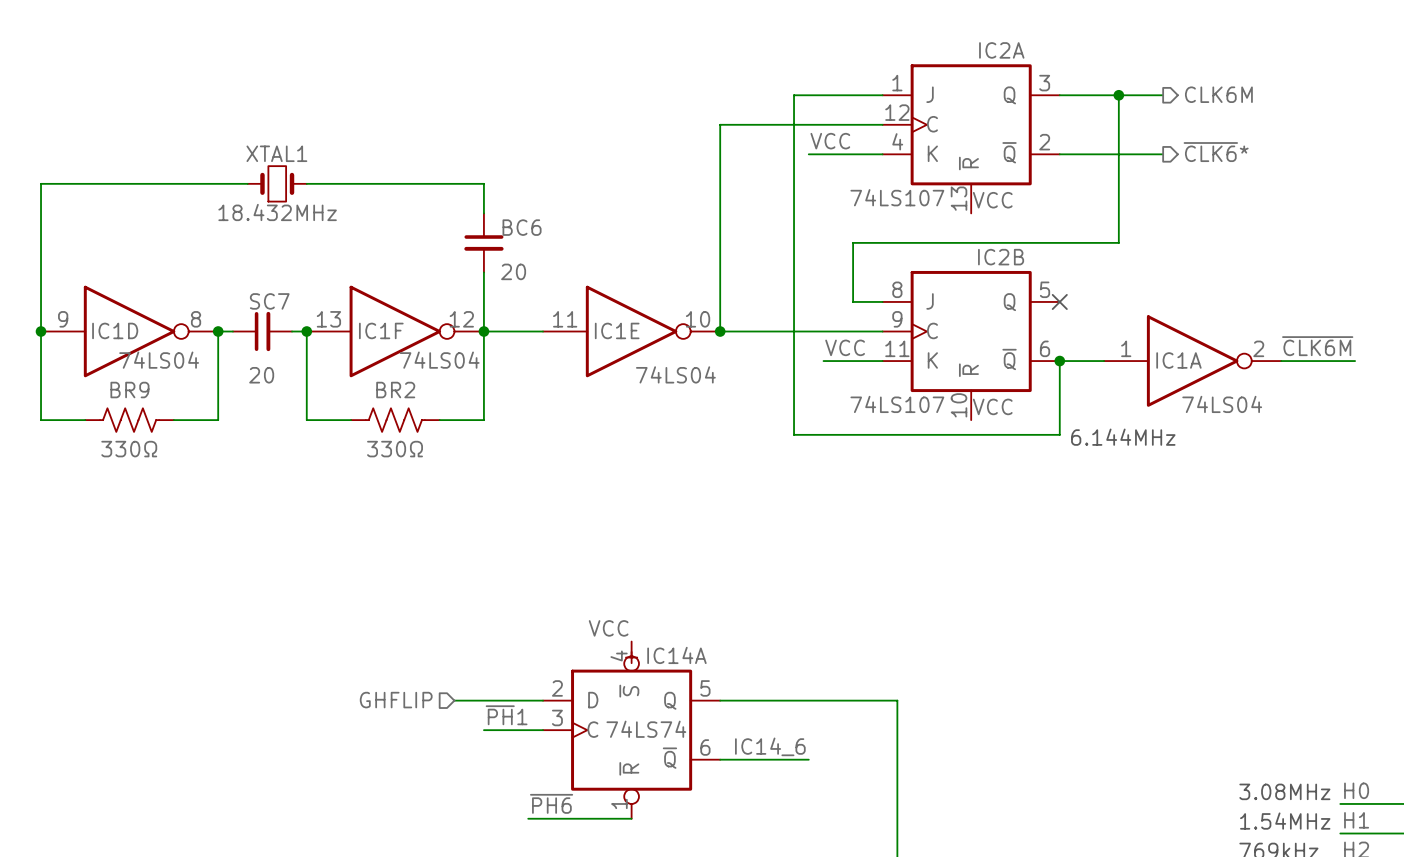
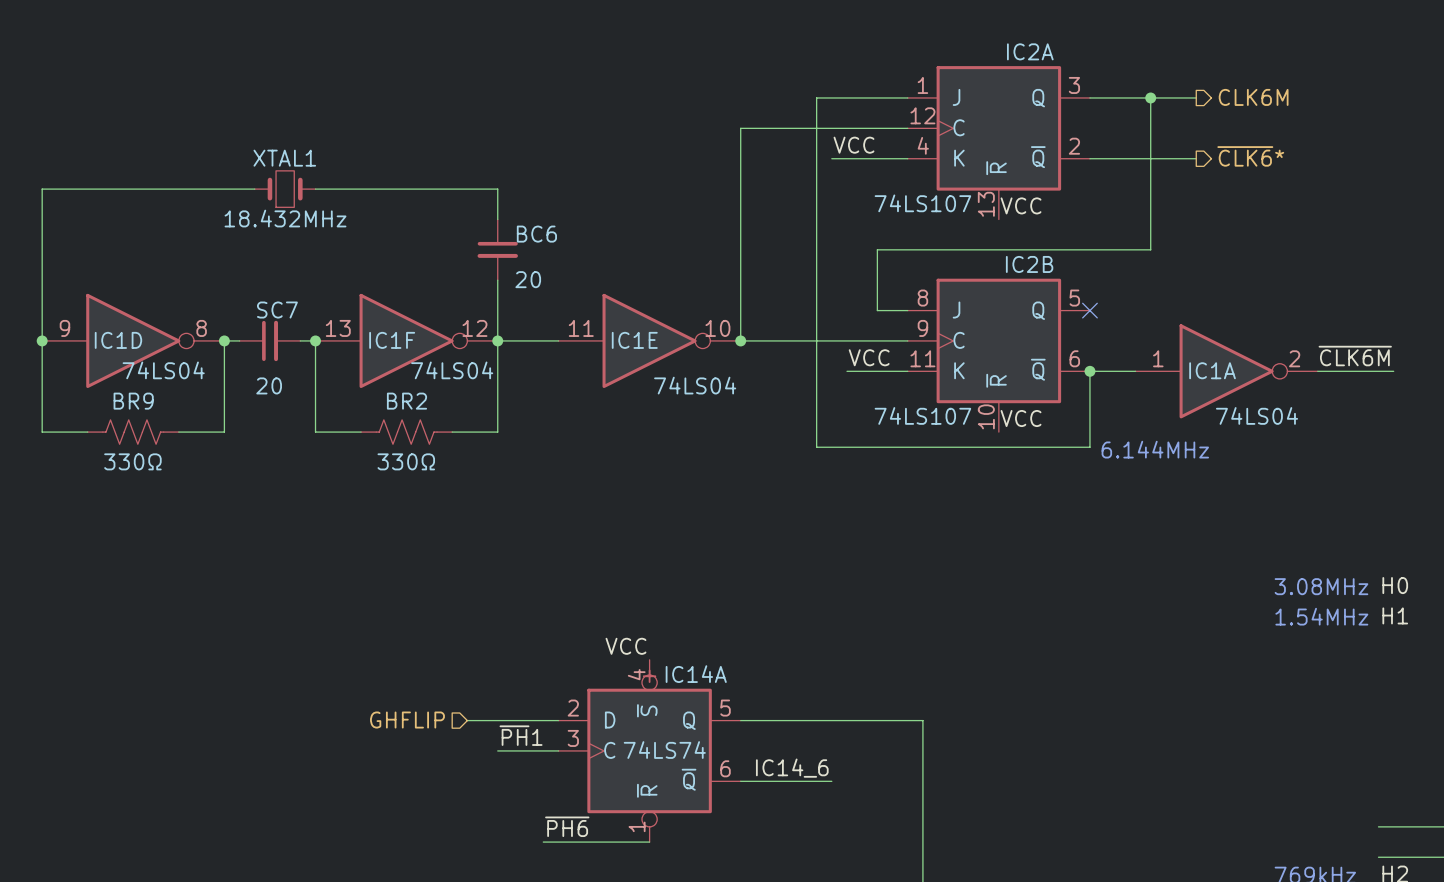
label position: H0 (1356, 790) -> H0 (1395, 585)
text position: 3.08MHz (1284, 791) -> 3.08MHz (1321, 586)
label position: H1 (1356, 820) -> H1 (1395, 615)
text position: 1.54MHz (1285, 821) -> 1.54MHz (1321, 616)

